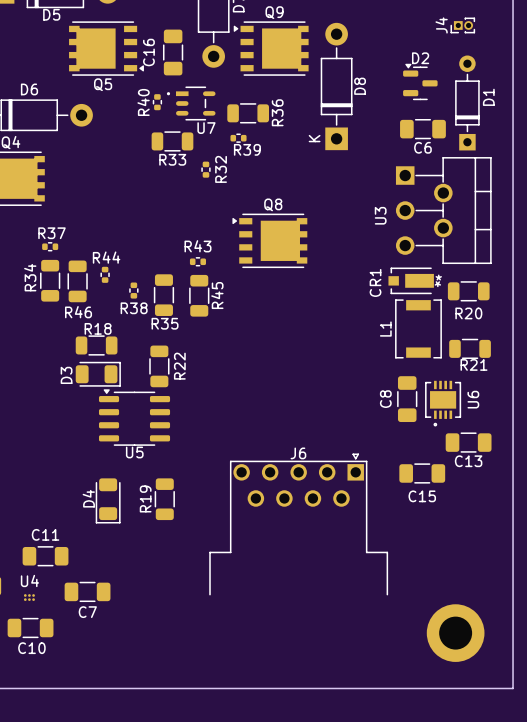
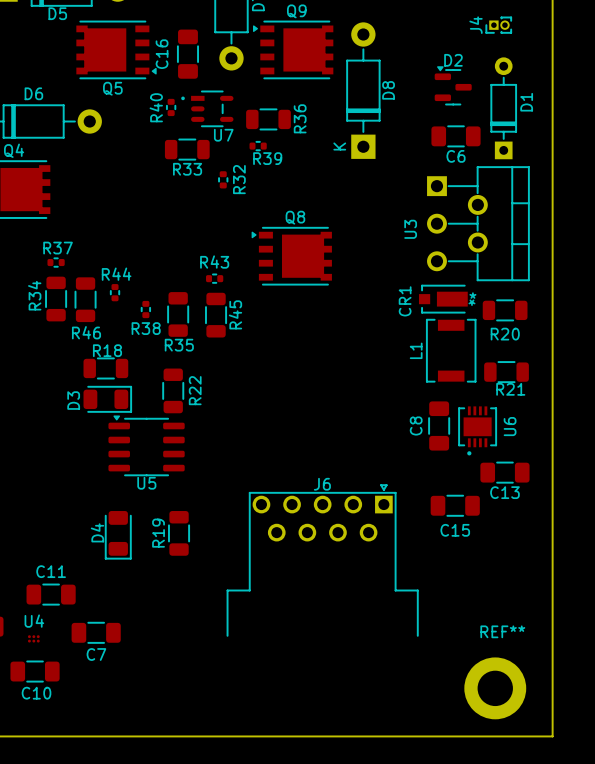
part: (455, 633) -> none
REF**: none -> (495, 688)

